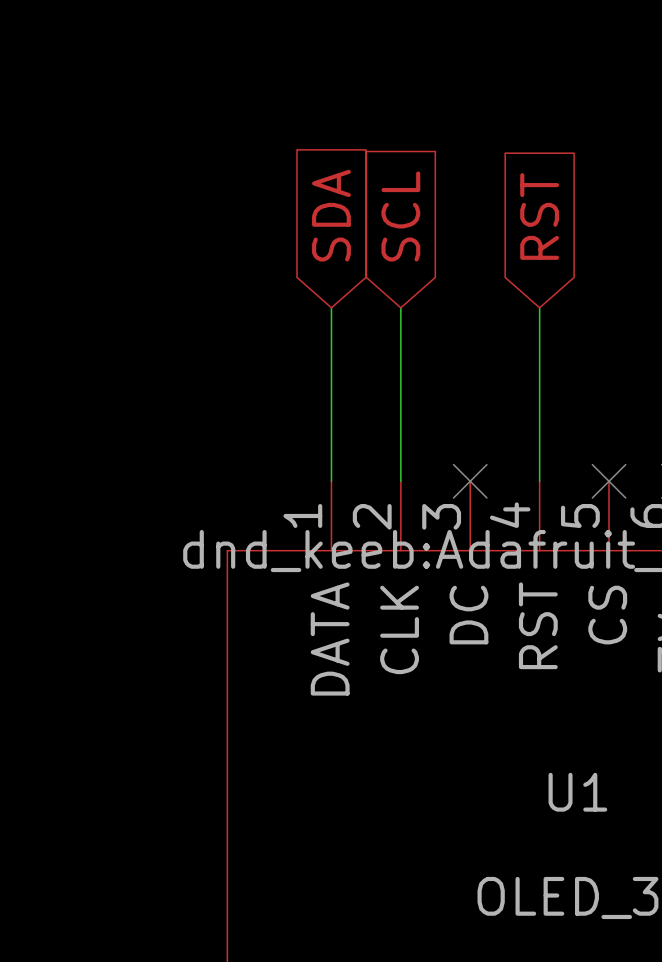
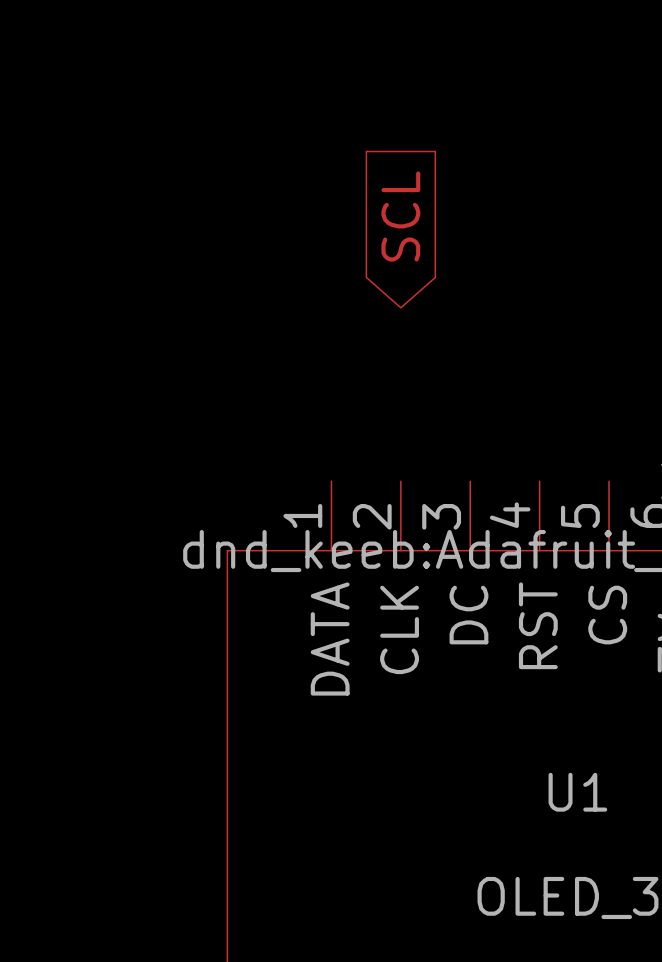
global label: SDA (331, 215) -> none
global label: RST (539, 216) -> none
wire: (331, 307) (331, 481) -> none
wire: (400, 307) (400, 481) -> none
wire: (539, 307) (539, 481) -> none
no-connect mark: (470, 481) -> none
no-connect mark: (609, 481) -> none

